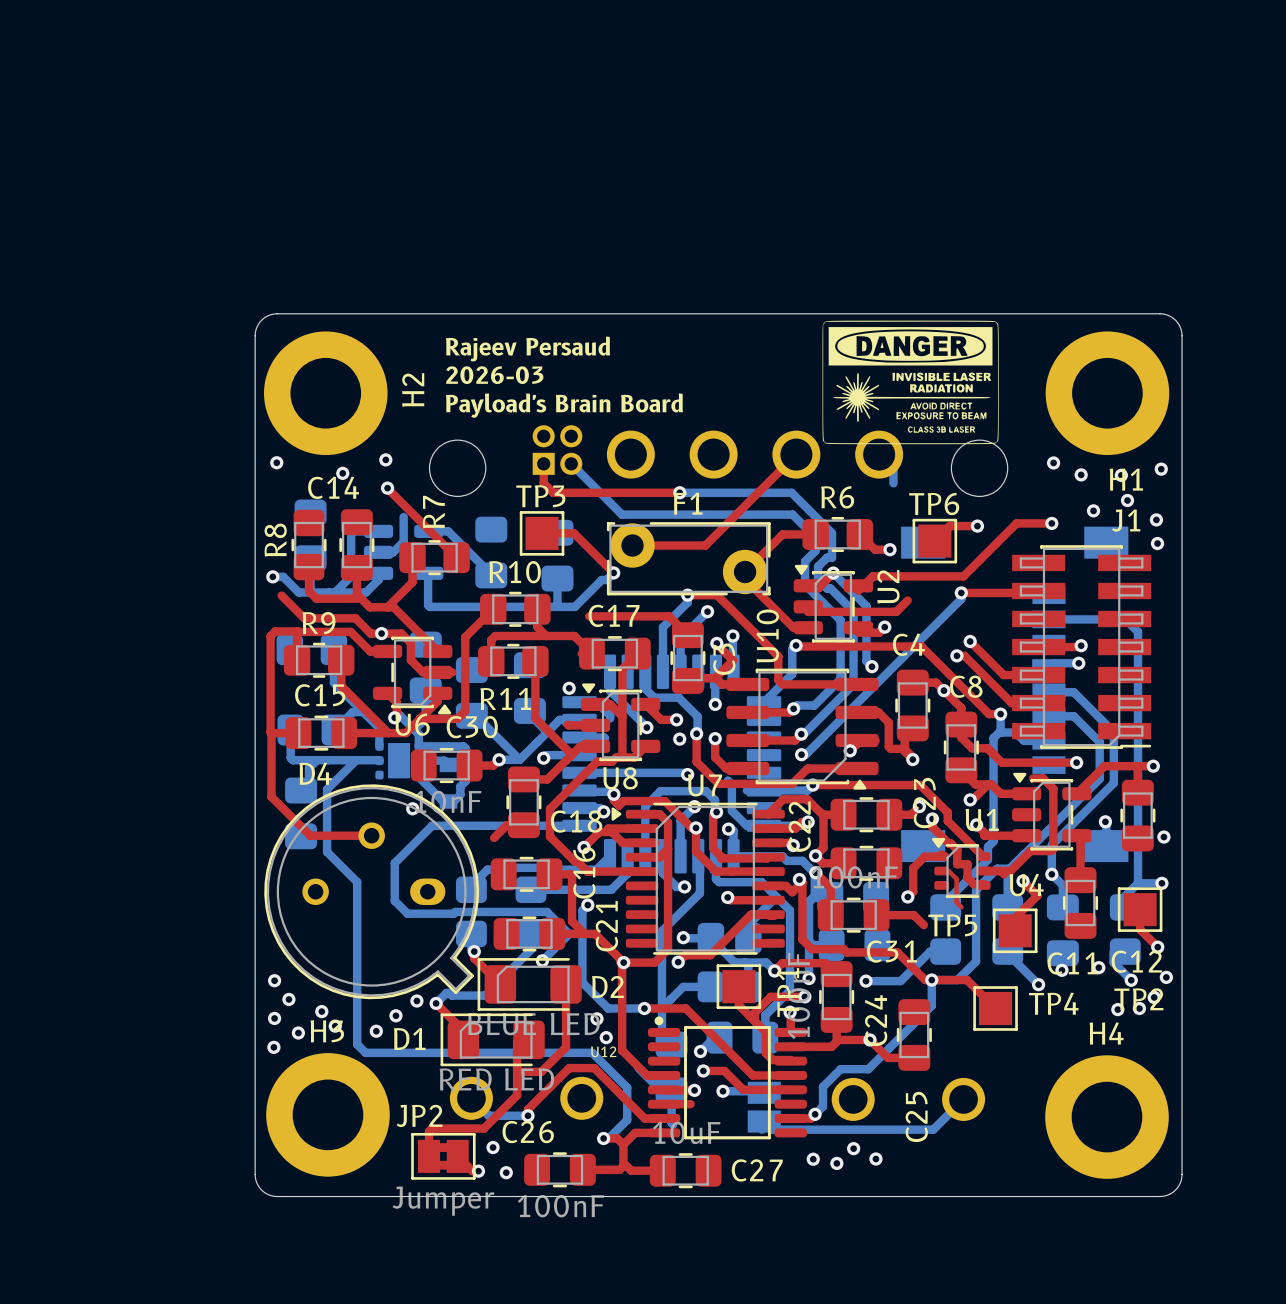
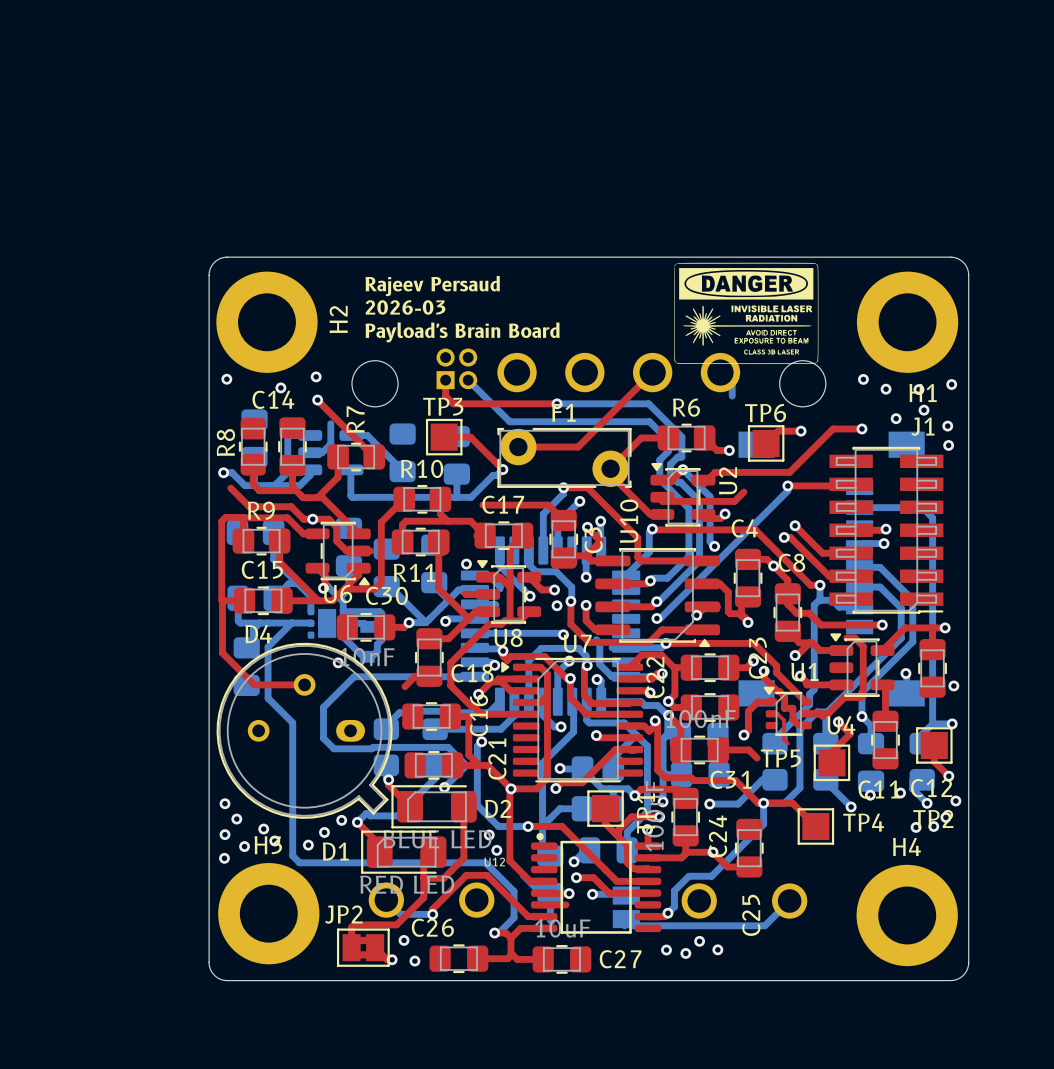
JP2 value: Jumper (443, 1201) -> none
C26 value: 100nF (561, 1206) -> none

